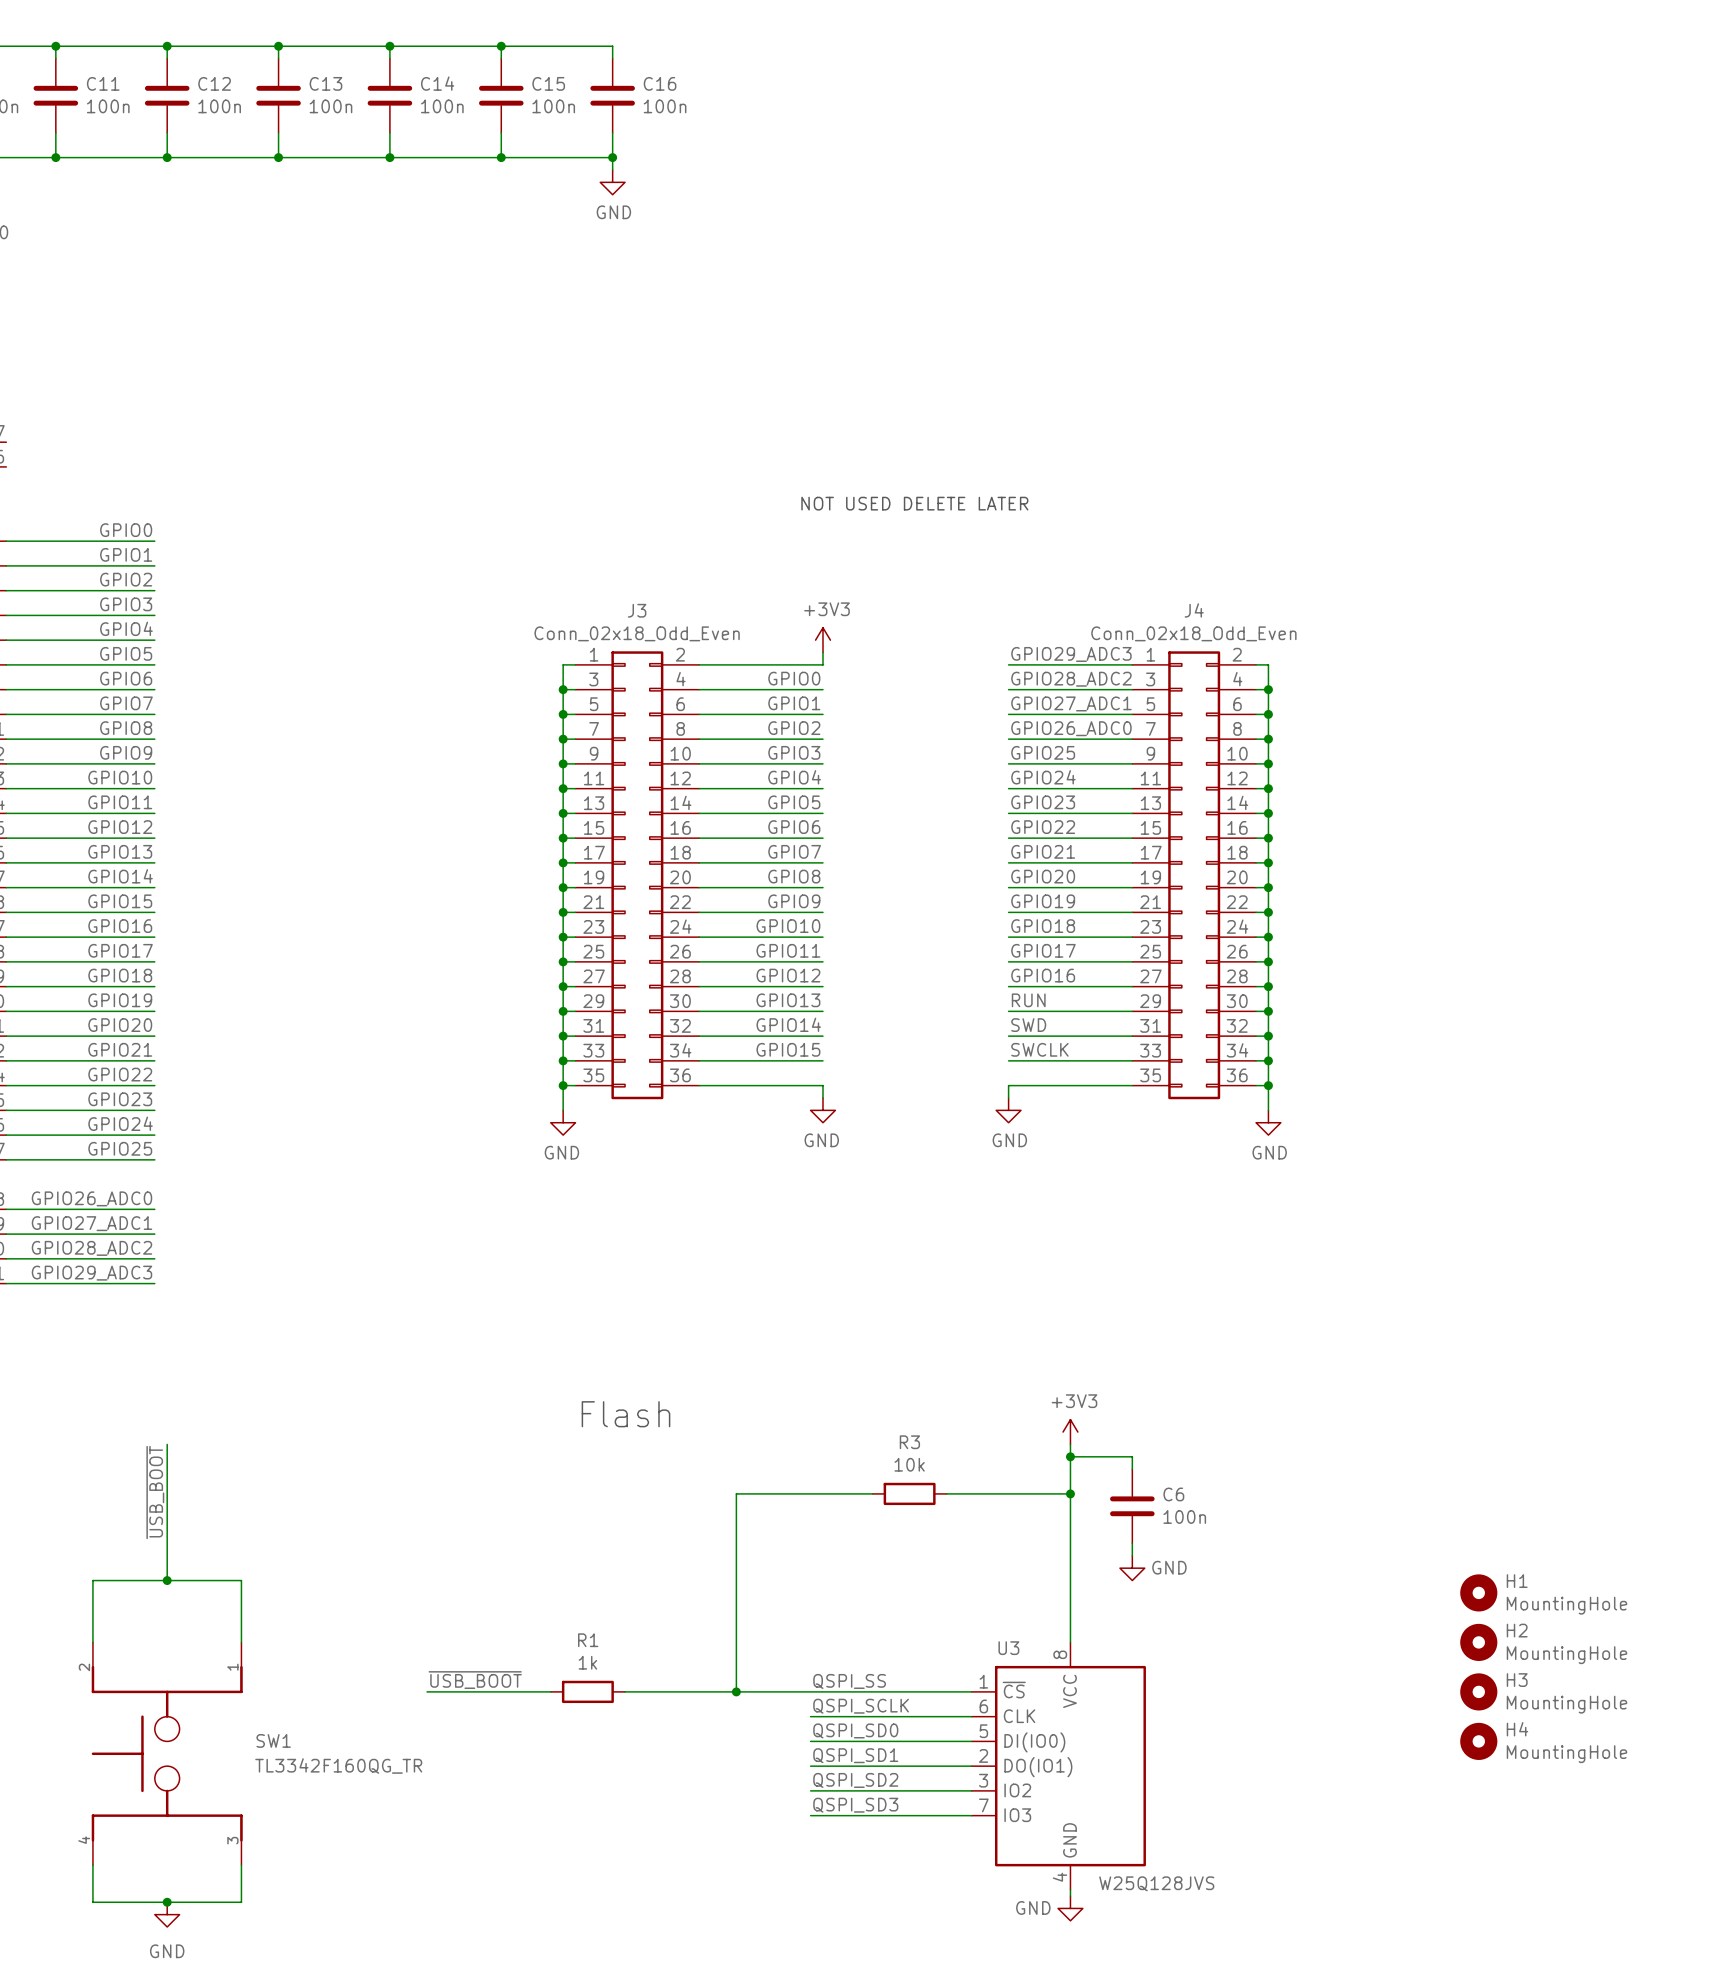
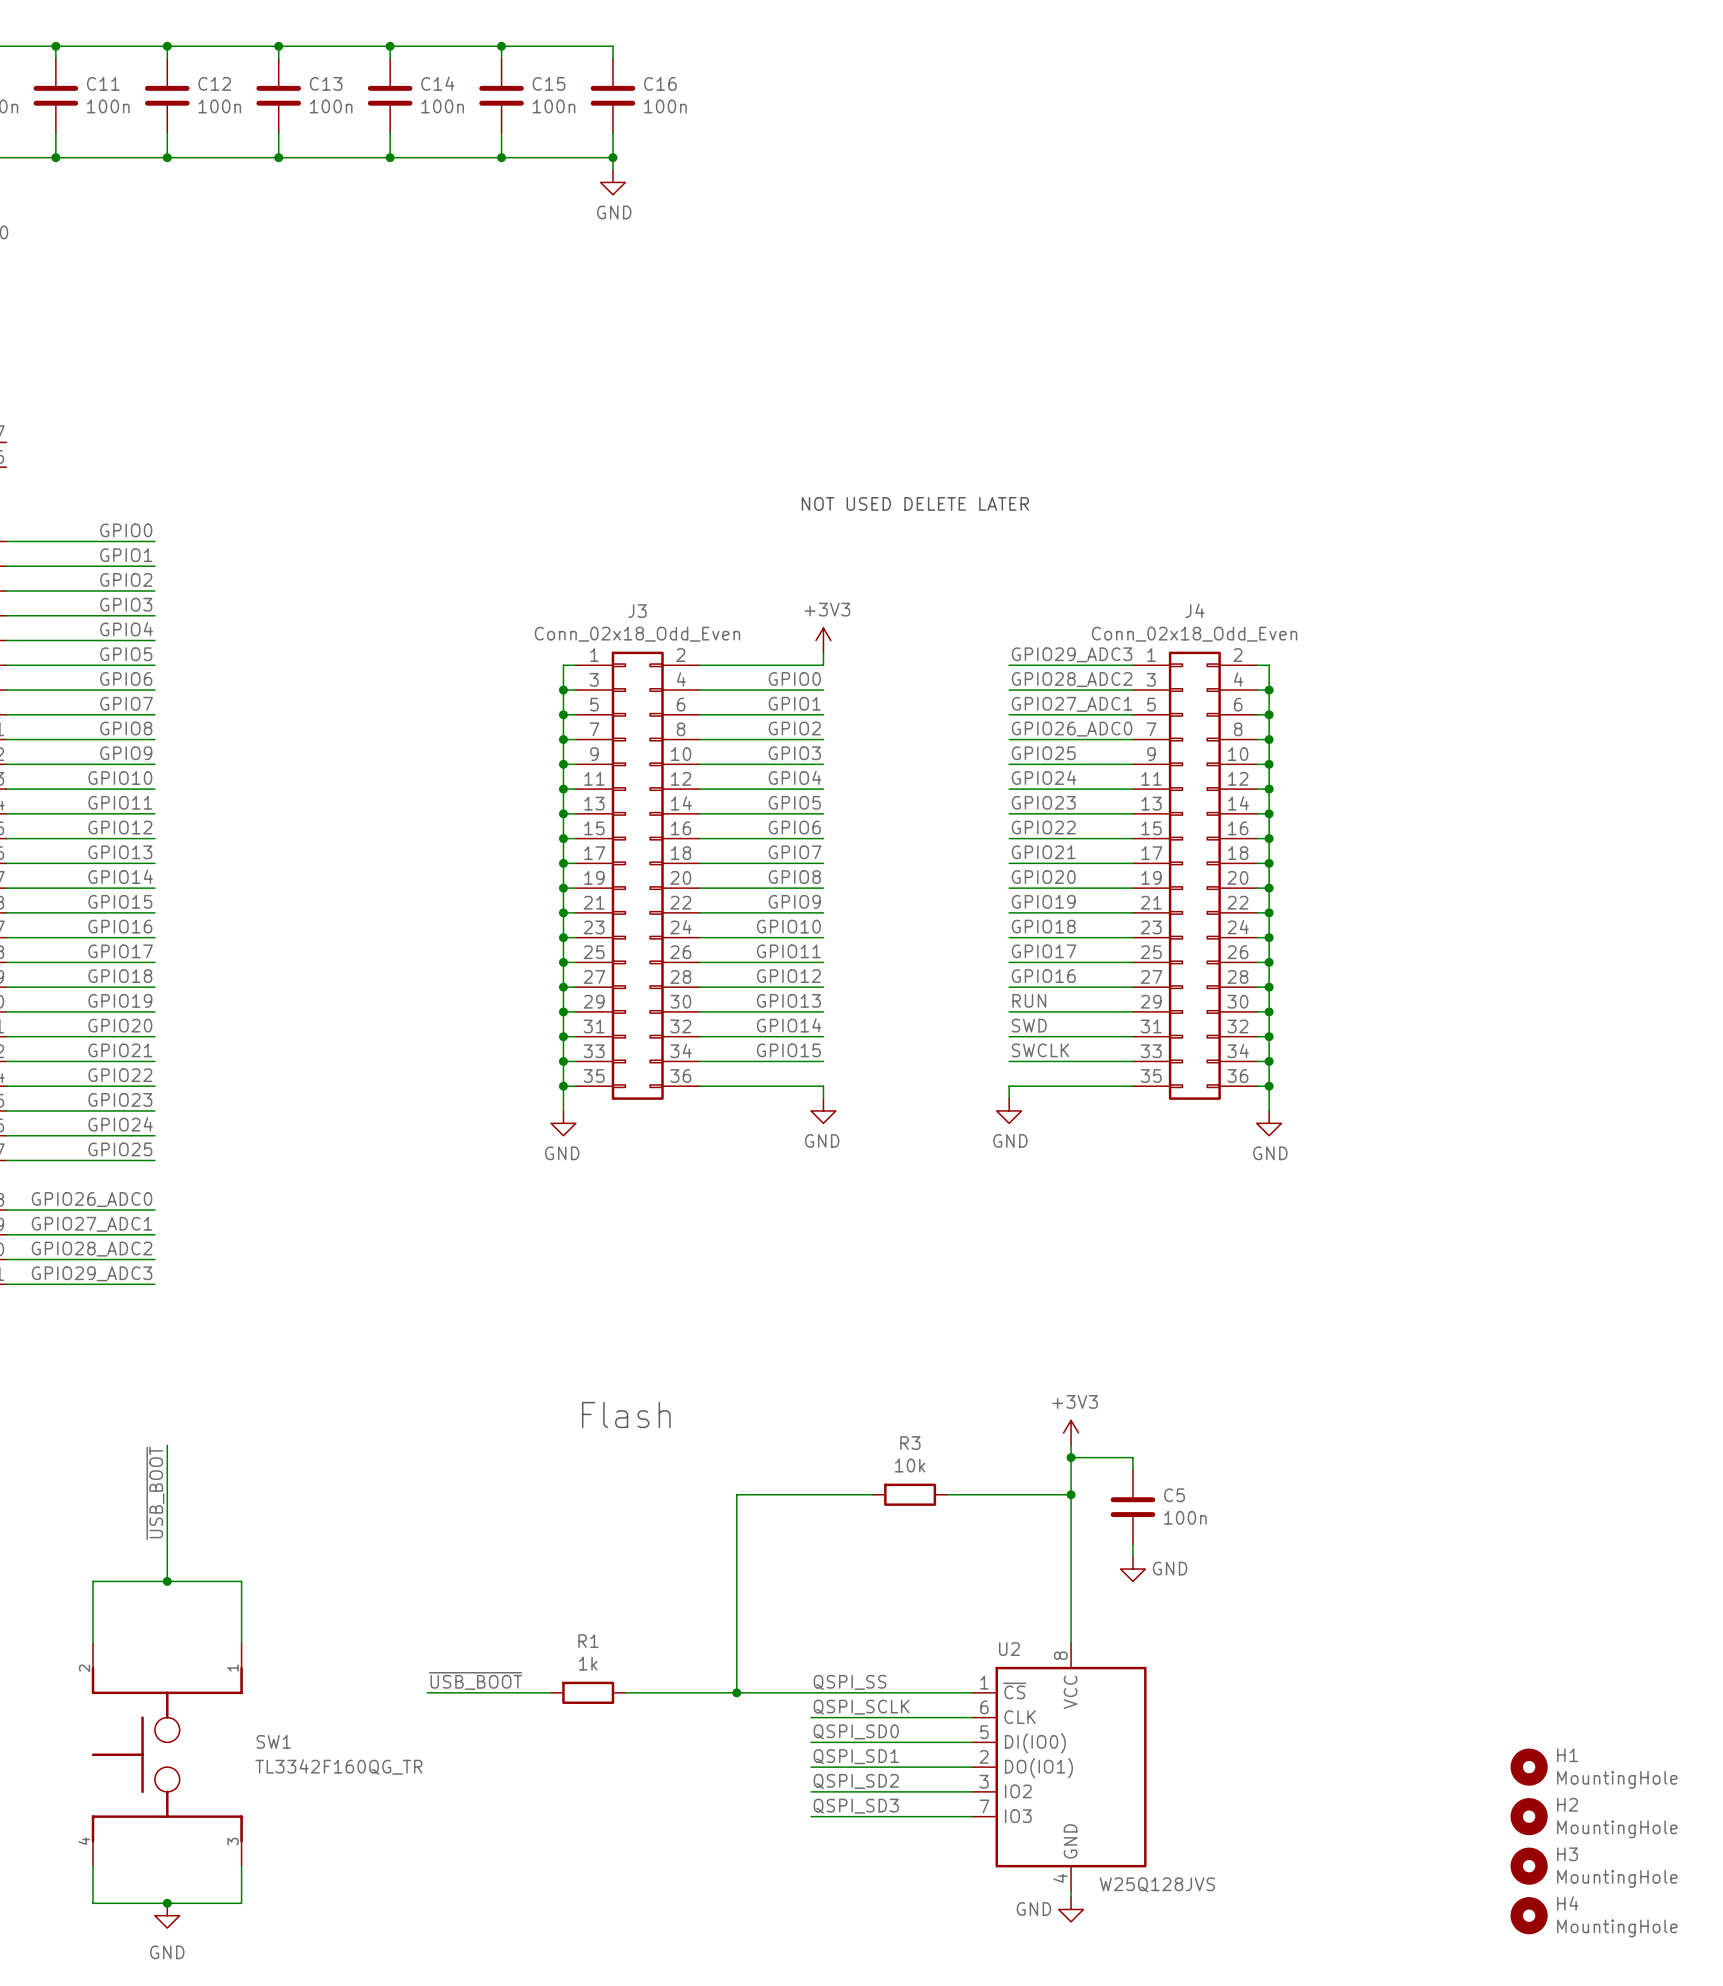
C6 name: C6 (1173, 1494) -> C5 (1174, 1495)
H1 position: (1478, 1592) -> (1529, 1767)
H2 position: (1478, 1642) -> (1529, 1816)
U3 name: U3 (1008, 1648) -> U2 (1009, 1649)
H3 position: (1478, 1691) -> (1529, 1866)
H4 position: (1478, 1741) -> (1529, 1915)

